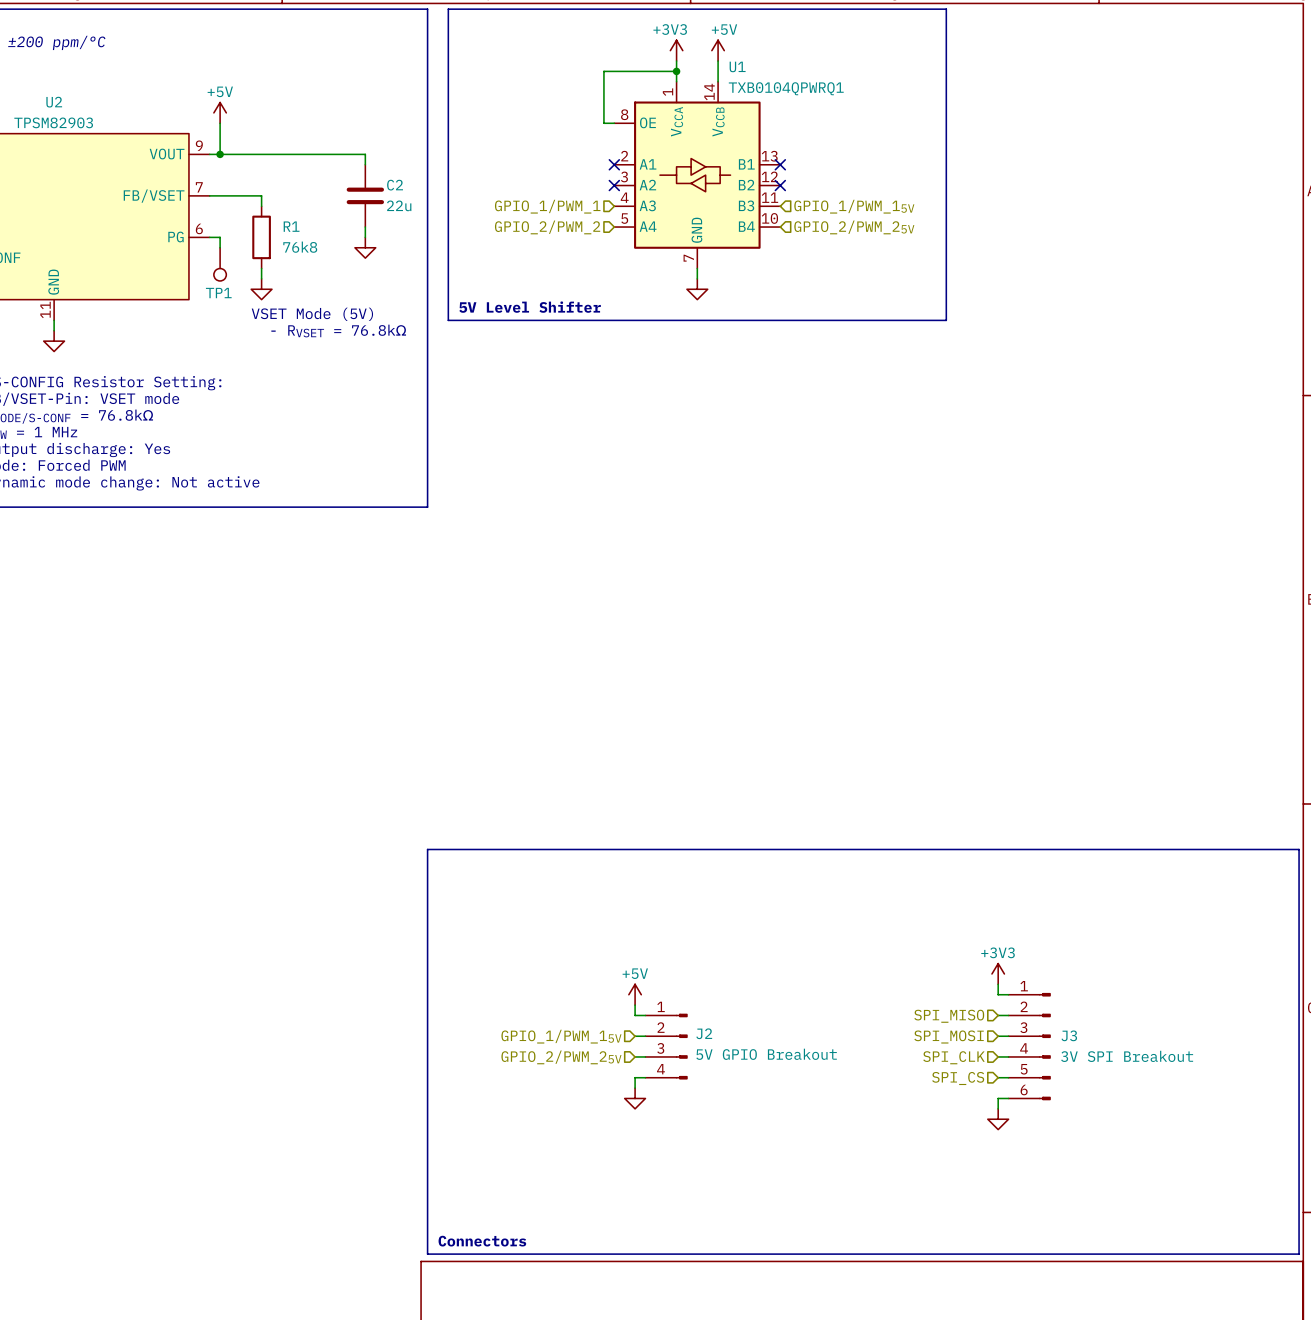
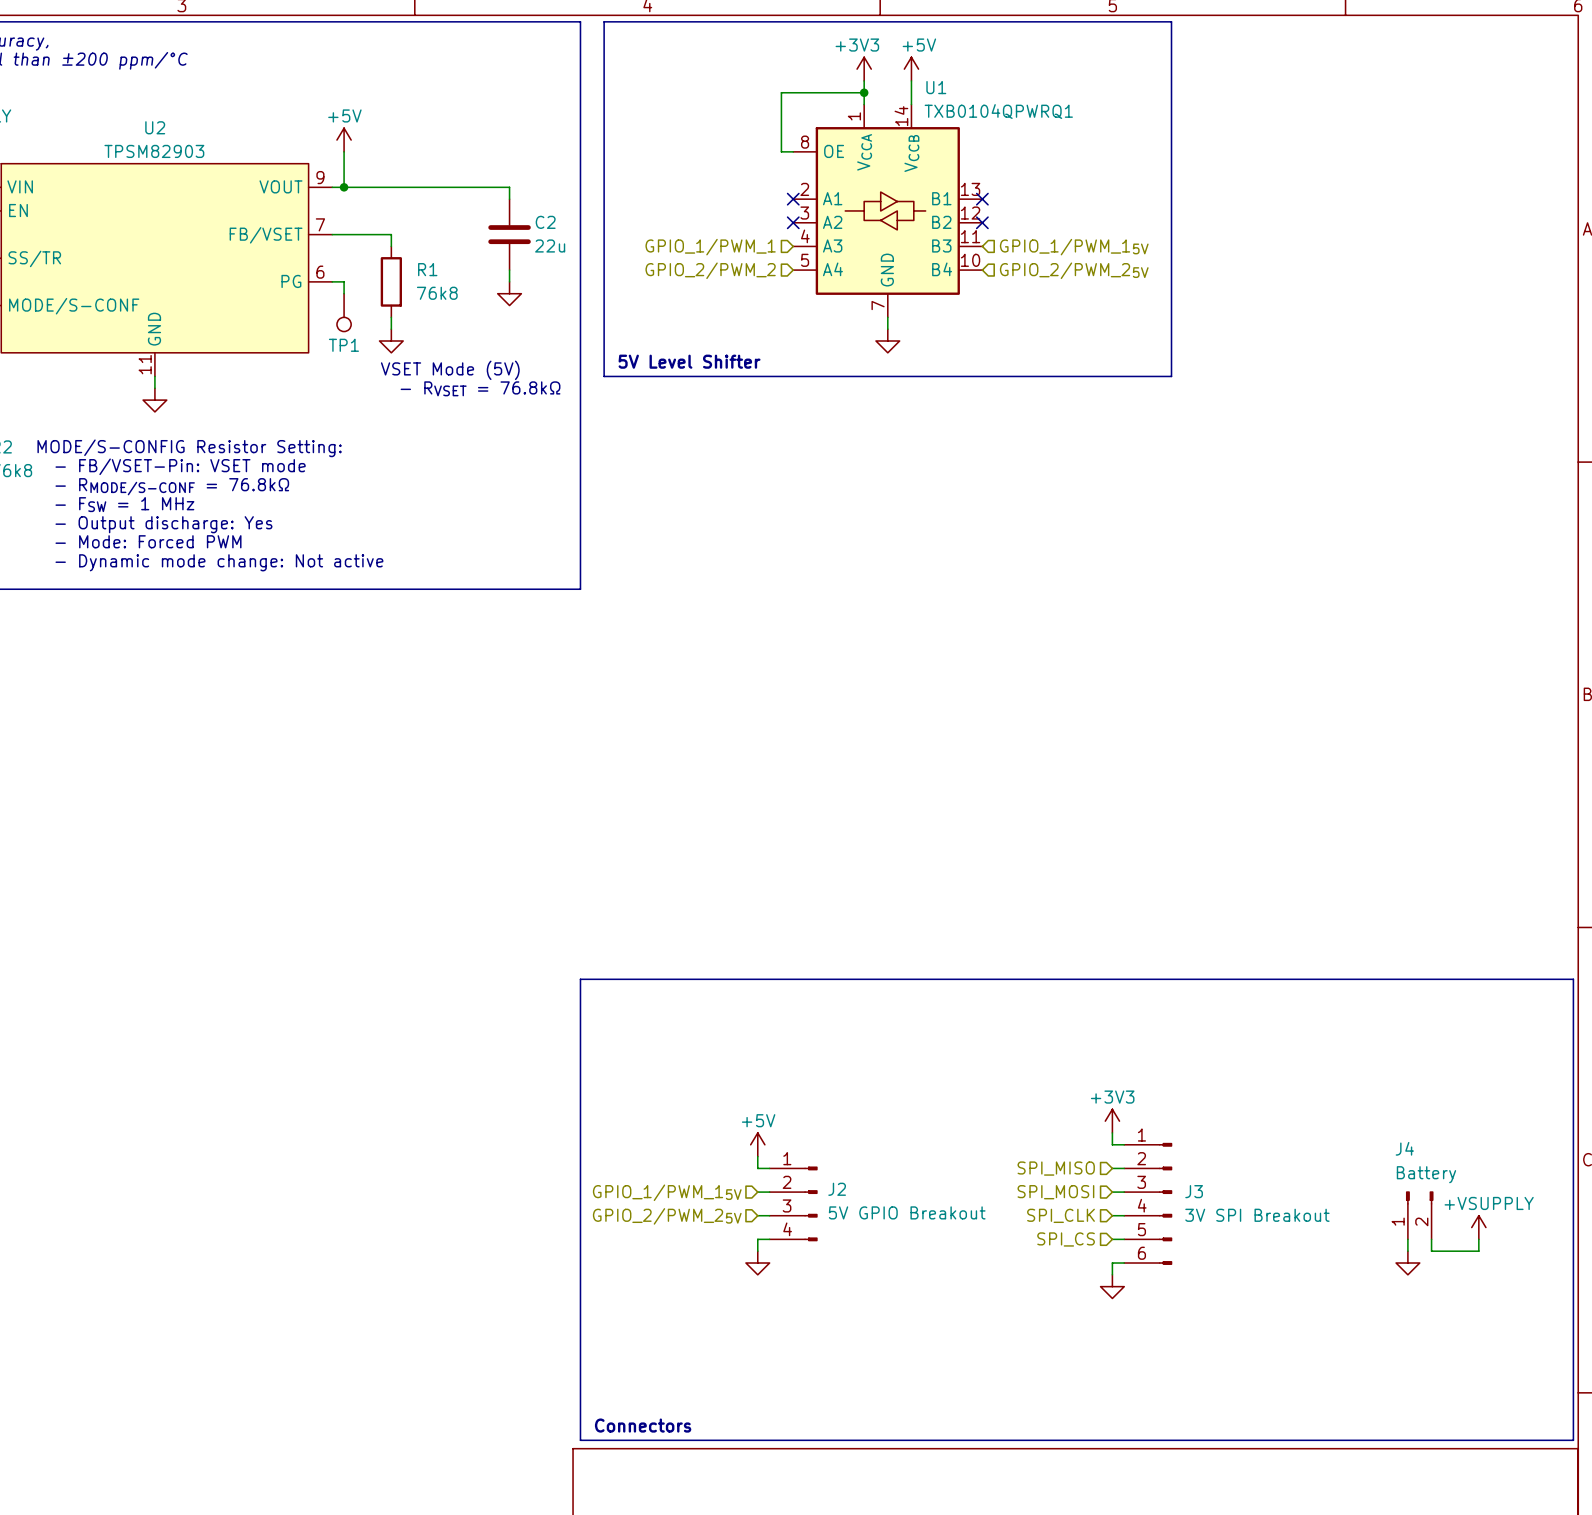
power symbol position: +3V3 (998, 973) -> +3V3 (1112, 1121)
wire: (998, 984) (998, 994) (1008, 994) -> (1112, 1132) (1112, 1144) (1124, 1144)
power symbol position: +5V (635, 994) -> +5V (757, 1144)
wire: (635, 1005) (635, 1015) (645, 1015) -> (757, 1156) (757, 1168) (769, 1168)
wire: (998, 1015) (1008, 1015) -> (1112, 1168) (1124, 1168)
hierarchical label position: SPI_MISO (949, 1016) -> SPI_MISO (1056, 1168)
hierarchical label position: GPIO_1/PWM_15V (561, 1036) -> GPIO_1/PWM_15V (667, 1192)
wire: (635, 1036) (645, 1036) -> (757, 1192) (769, 1192)
wire: (998, 1036) (1008, 1036) -> (1112, 1192) (1124, 1192)
hierarchical label position: SPI_MOSI (949, 1037) -> SPI_MOSI (1055, 1192)
J2 position: (666, 1046) -> (793, 1203)
J3 position: (1029, 1046) -> (1148, 1203)
wire: (635, 1056) (645, 1056) -> (757, 1215) (769, 1215)
wire: (998, 1056) (1008, 1056) -> (1112, 1215) (1124, 1215)
J4: none -> Battery (1419, 1215)
hierarchical label position: GPIO_2/PWM_25V (561, 1057) -> GPIO_2/PWM_25V (667, 1216)
hierarchical label position: SPI_CLK (953, 1057) -> SPI_CLK (1060, 1215)
power symbol: none -> +VSUPPLY (1478, 1227)
wire: (645, 1077) (635, 1077) (635, 1088) -> (769, 1239) (757, 1239) (757, 1251)
wire: (998, 1077) (1008, 1077) -> (1112, 1239) (1124, 1239)
wire: none -> (1407, 1239) (1407, 1251)
wire: none -> (1431, 1239) (1431, 1251) (1478, 1251) (1478, 1239)
hierarchical label position: SPI_CS (958, 1078) -> SPI_CS (1066, 1239)
power symbol position: (635, 1098) -> (757, 1263)
wire: (1008, 1098) (998, 1098) (998, 1108) -> (1124, 1263) (1112, 1263) (1112, 1274)
power symbol: none -> (1407, 1263)
power symbol: none -> (1112, 1286)
power symbol: (998, 1119) -> none

